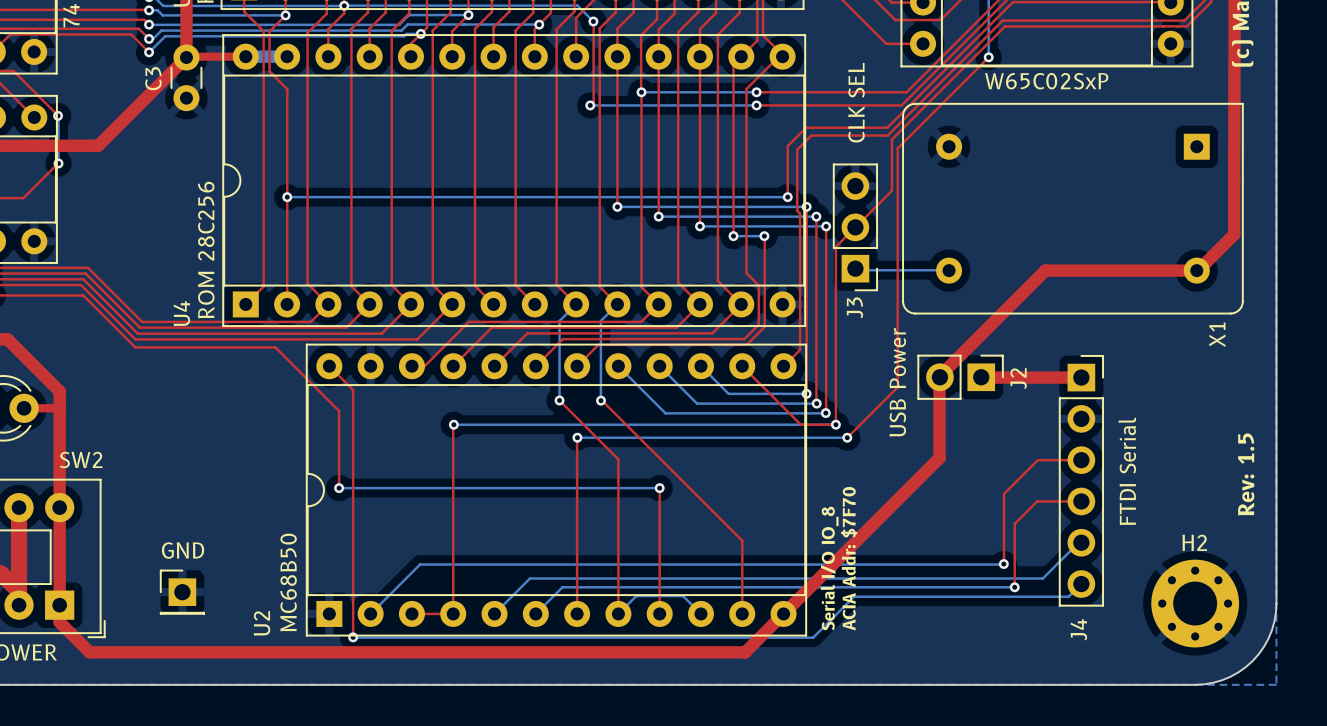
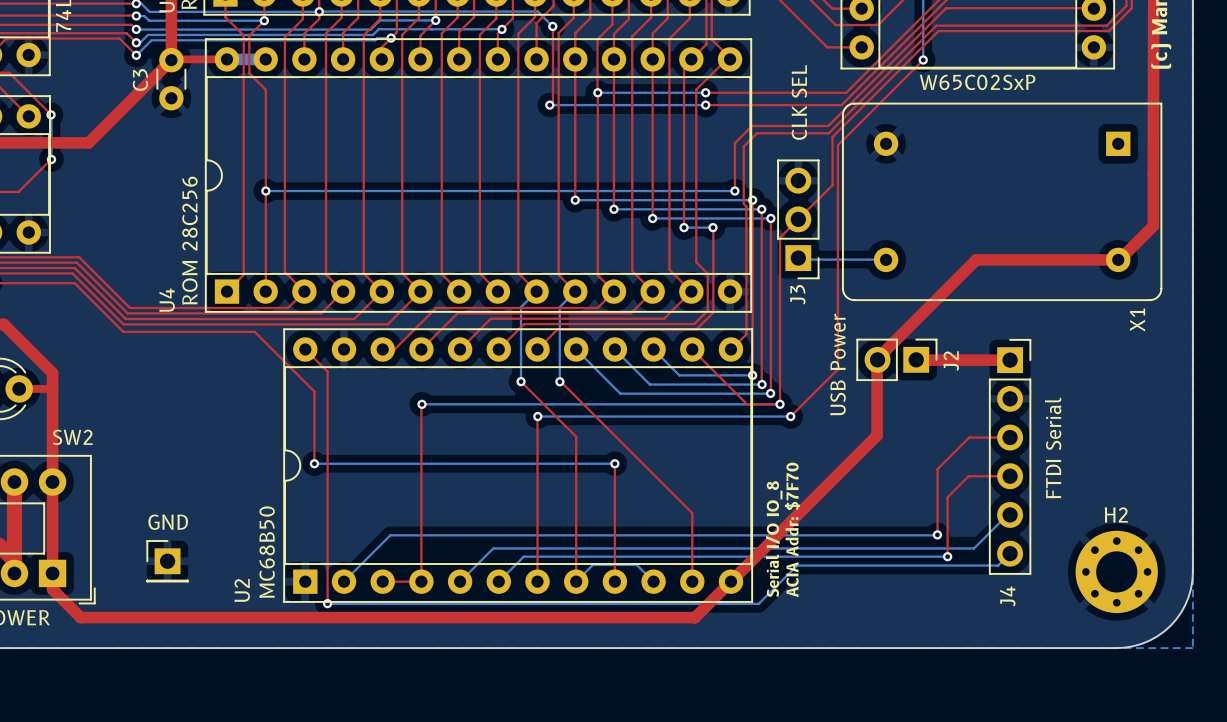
text: Rev: 1.5 (1246, 474) -> none

